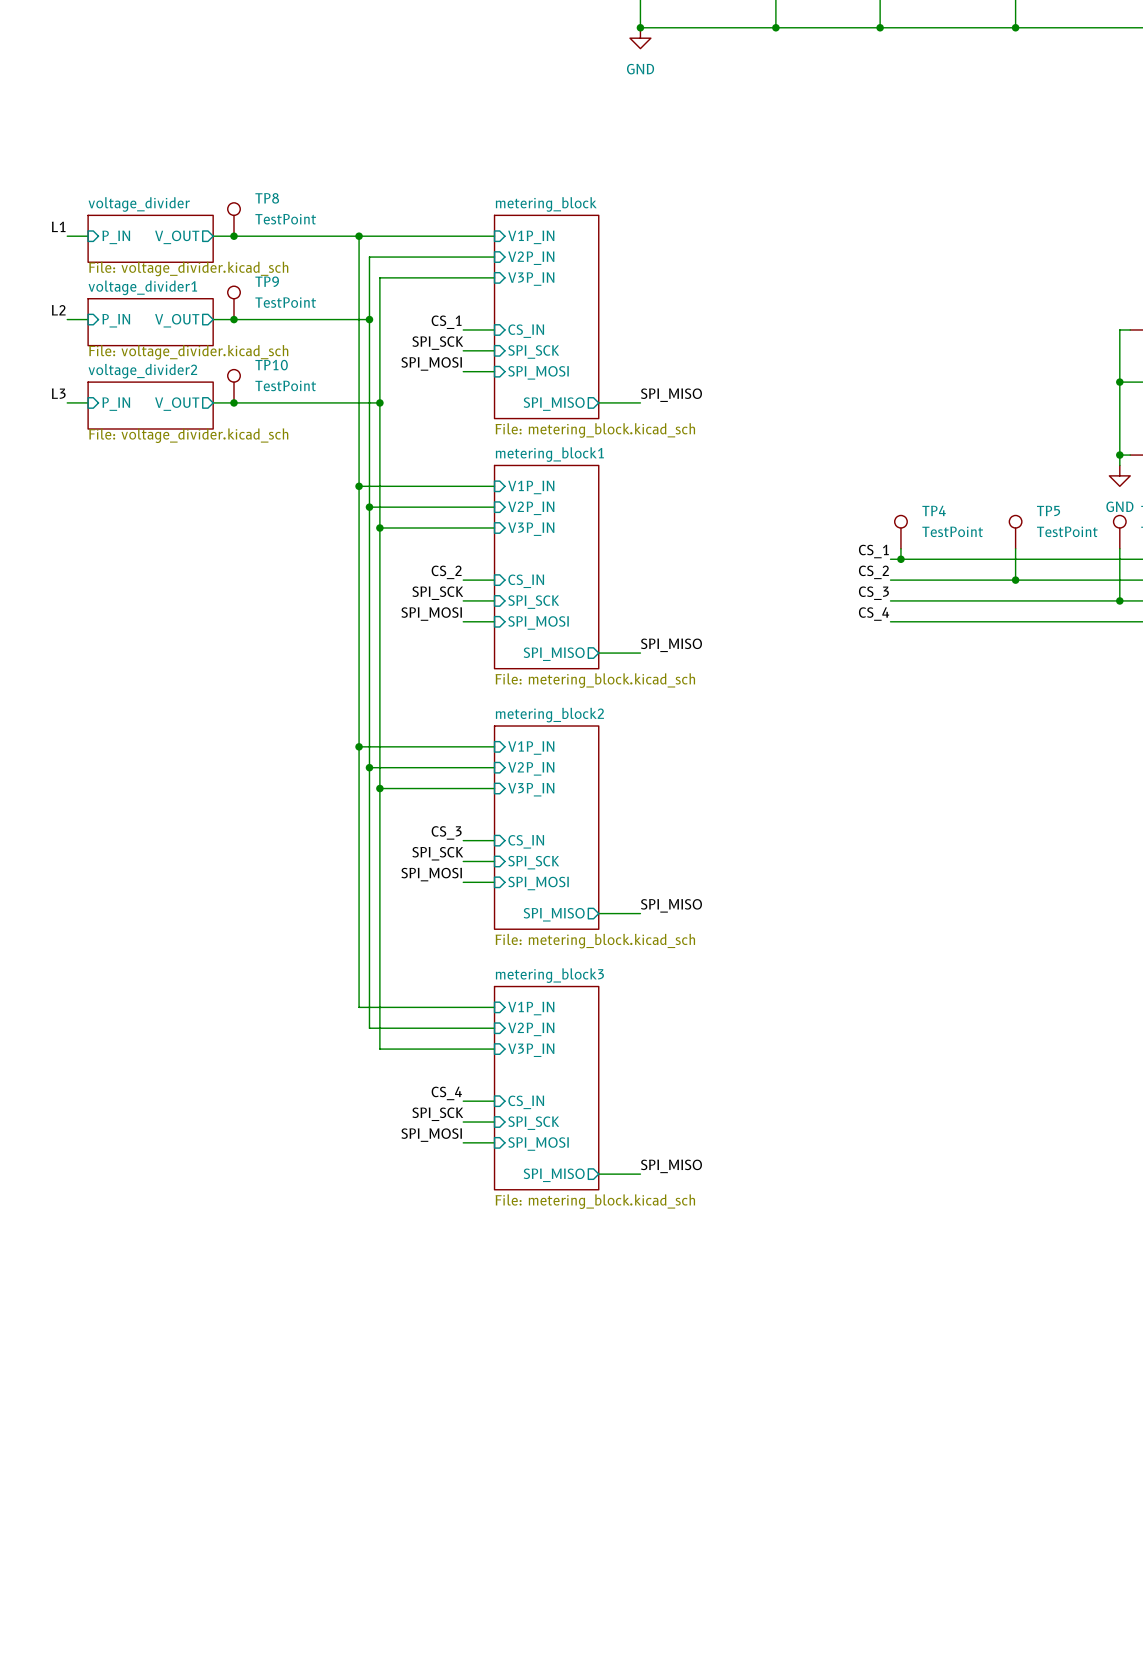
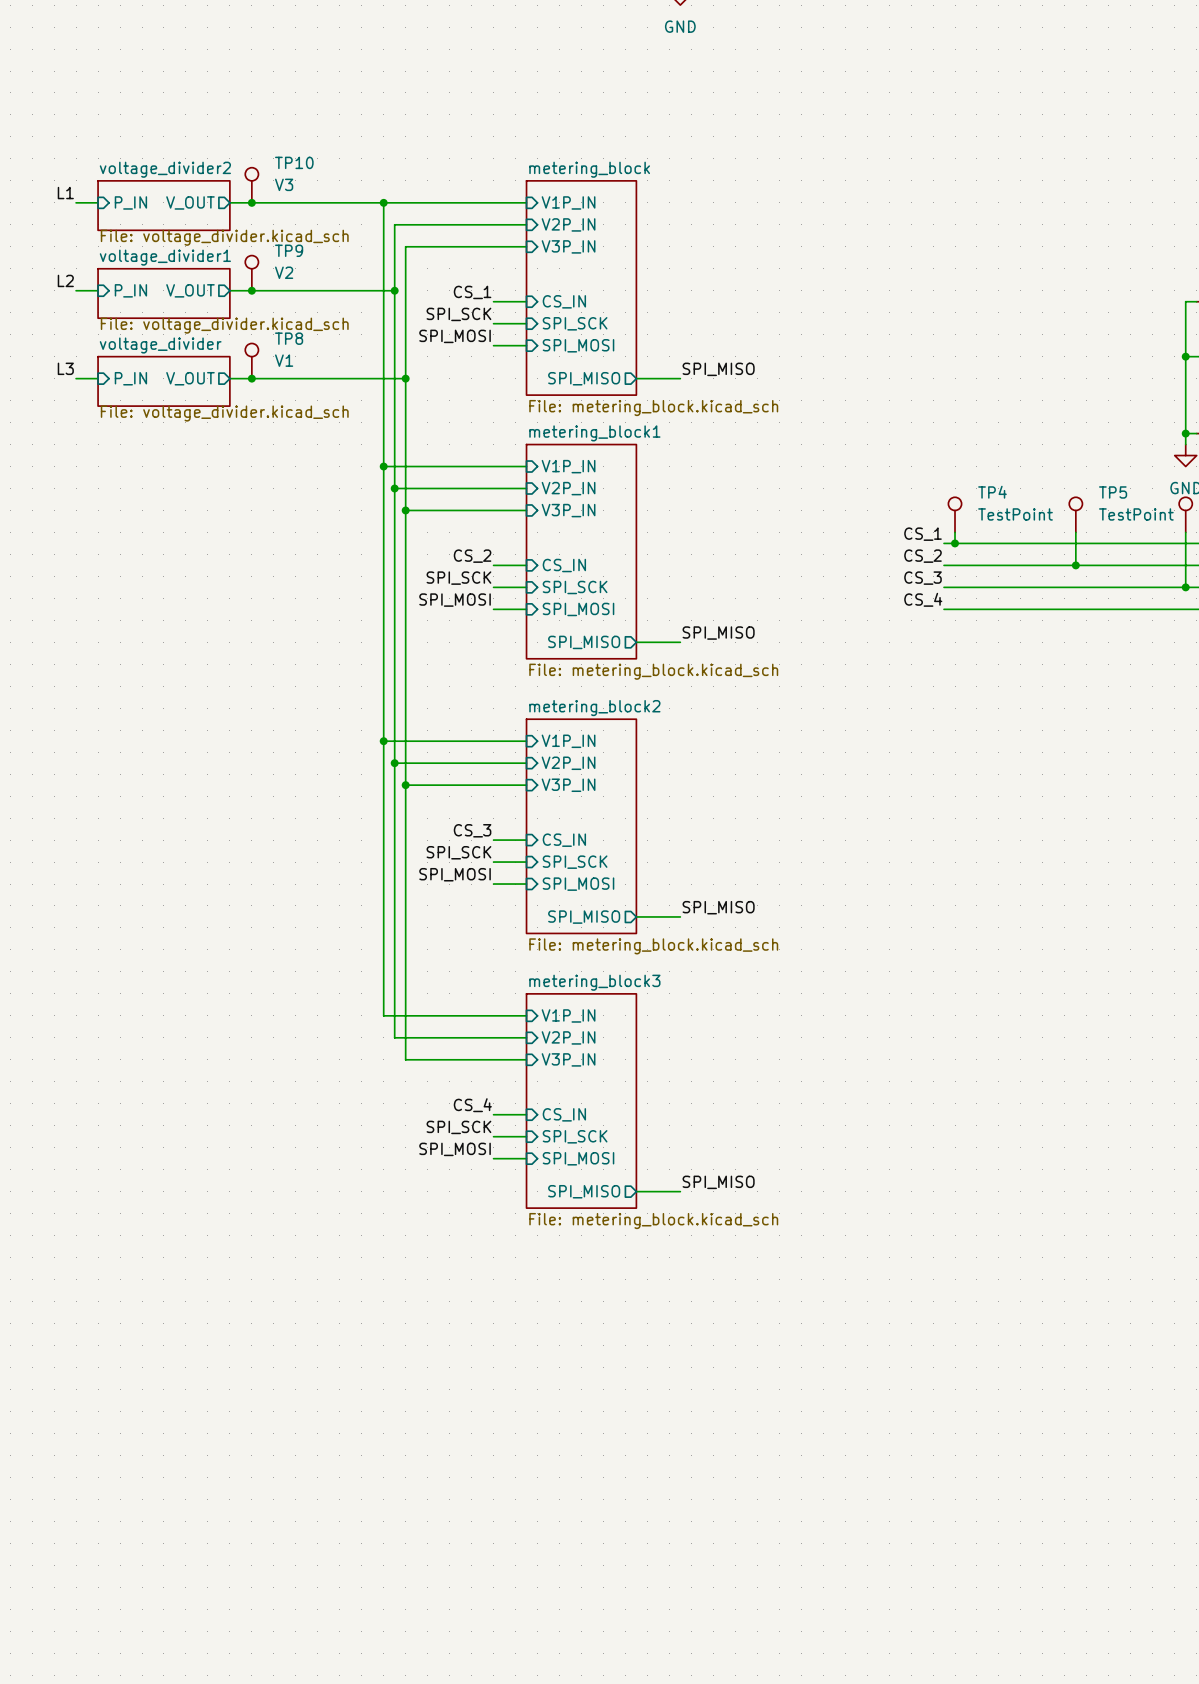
TP8 name: TP8 (267, 198) -> TP10 (294, 162)
sheet voltage_divider name: voltage_divider (139, 204) -> voltage_divider2 (165, 169)
TP8 value: TestPoint (285, 219) -> V3 (284, 184)
TP9 value: TestPoint (285, 302) -> V2 (284, 272)
TP10 name: TP10 (271, 365) -> TP8 (289, 338)
sheet voltage_divider2 name: voltage_divider2 (142, 371) -> voltage_divider (160, 345)
TP10 value: TestPoint (285, 385) -> V1 (284, 360)

